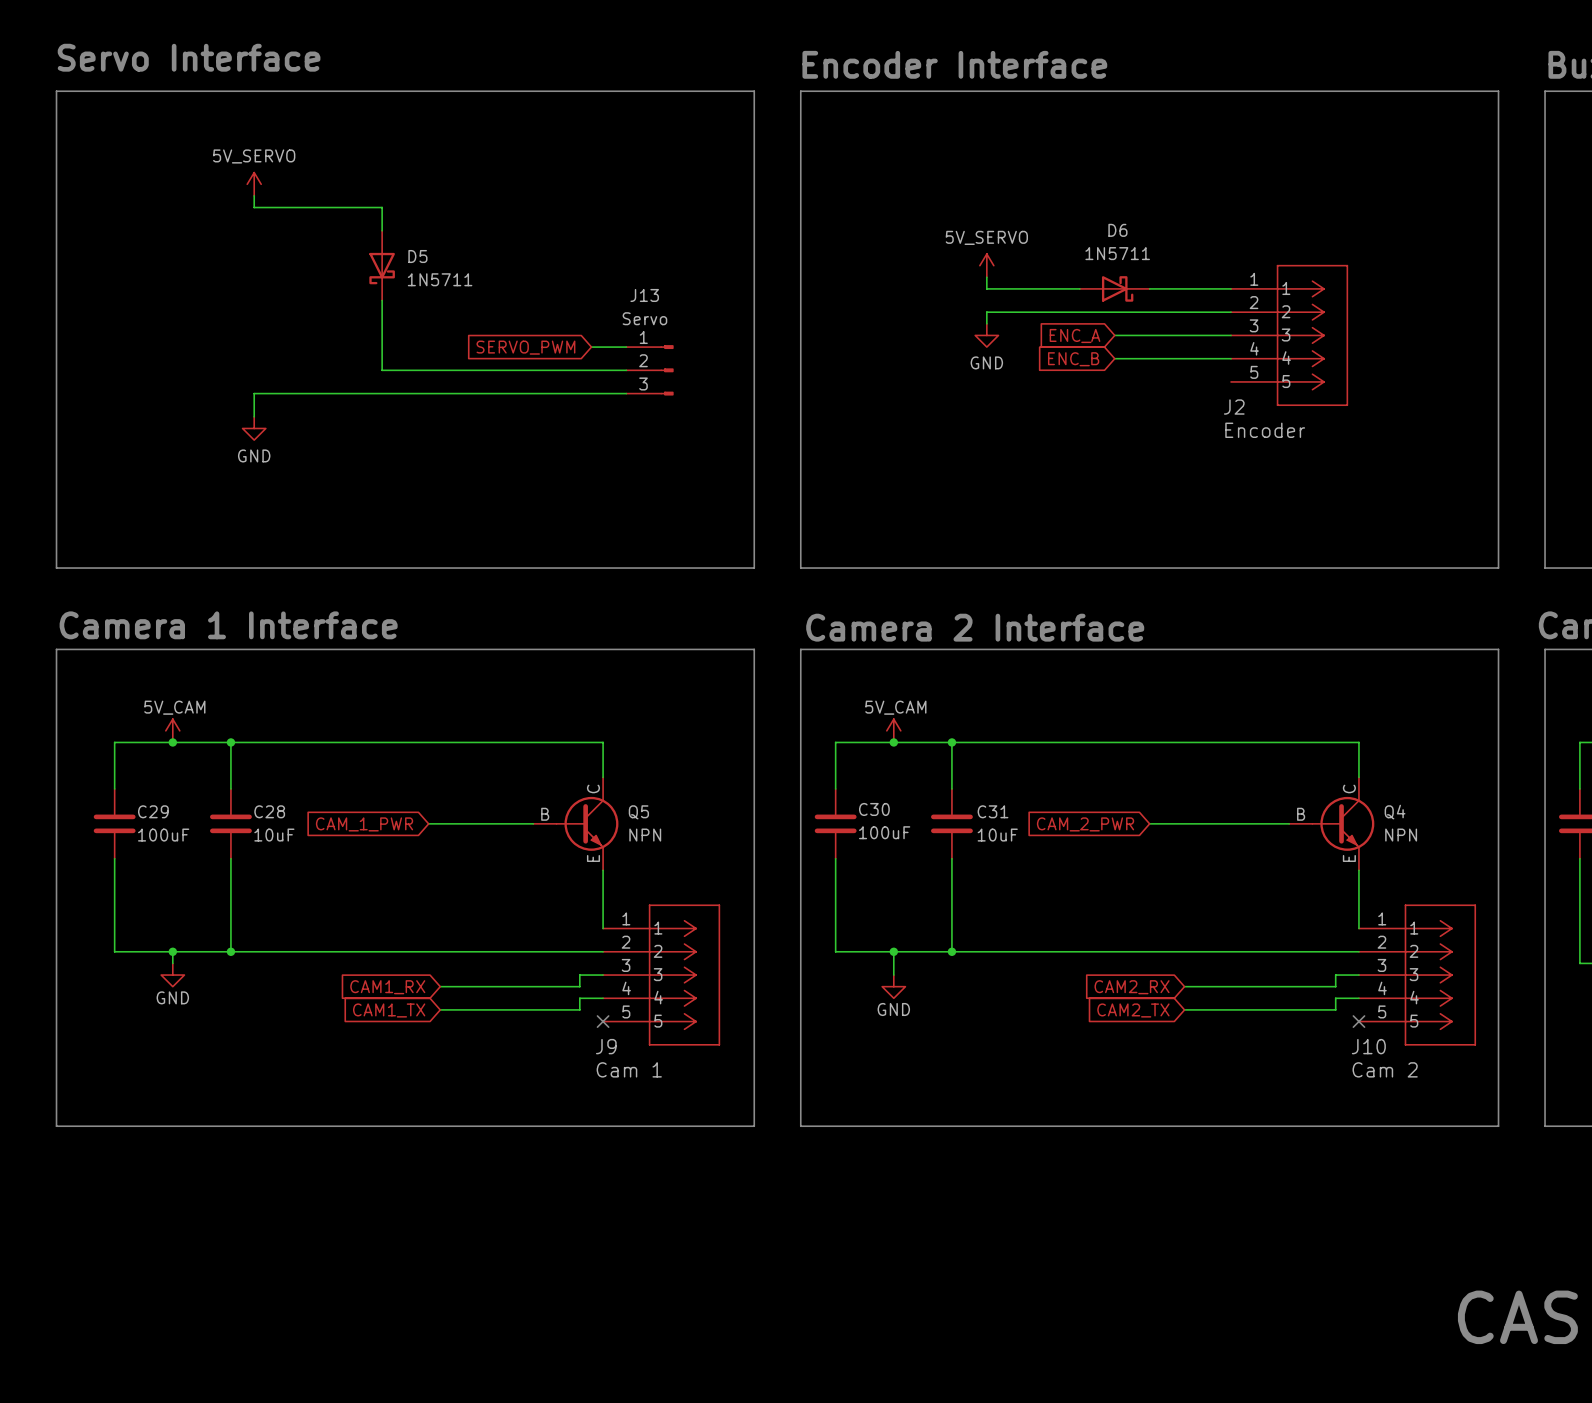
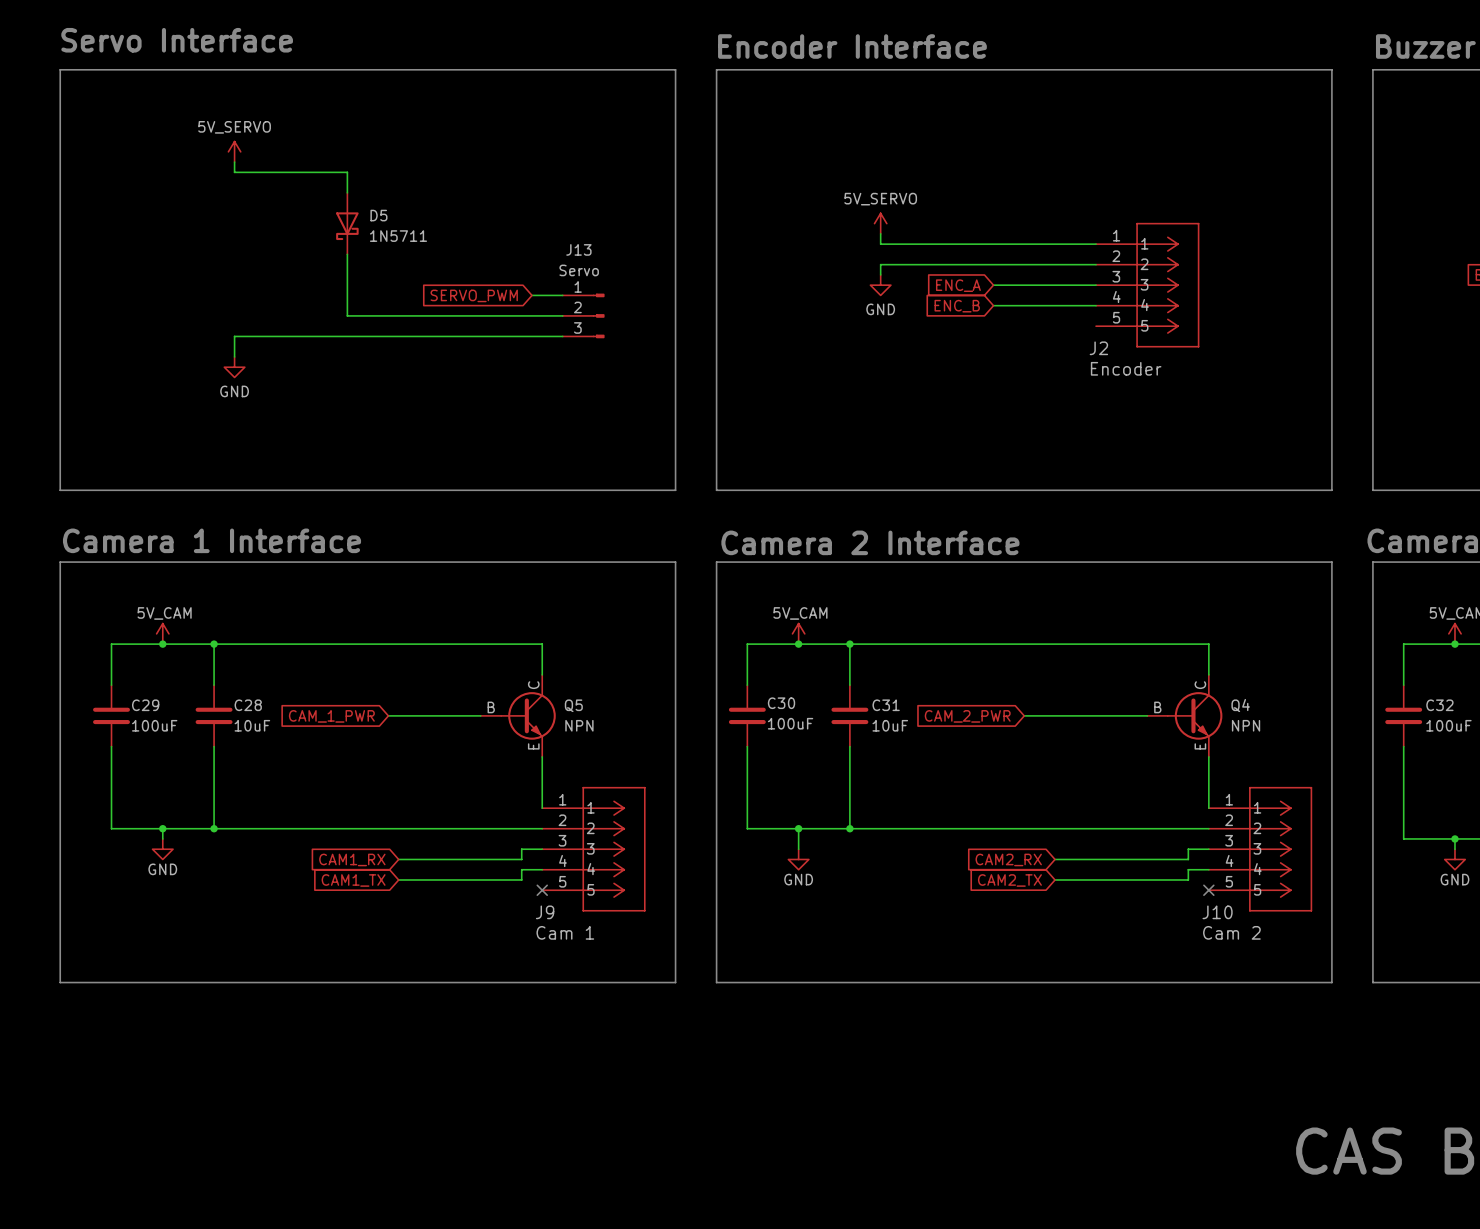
D6: 1N5711 (1114, 288) -> none

